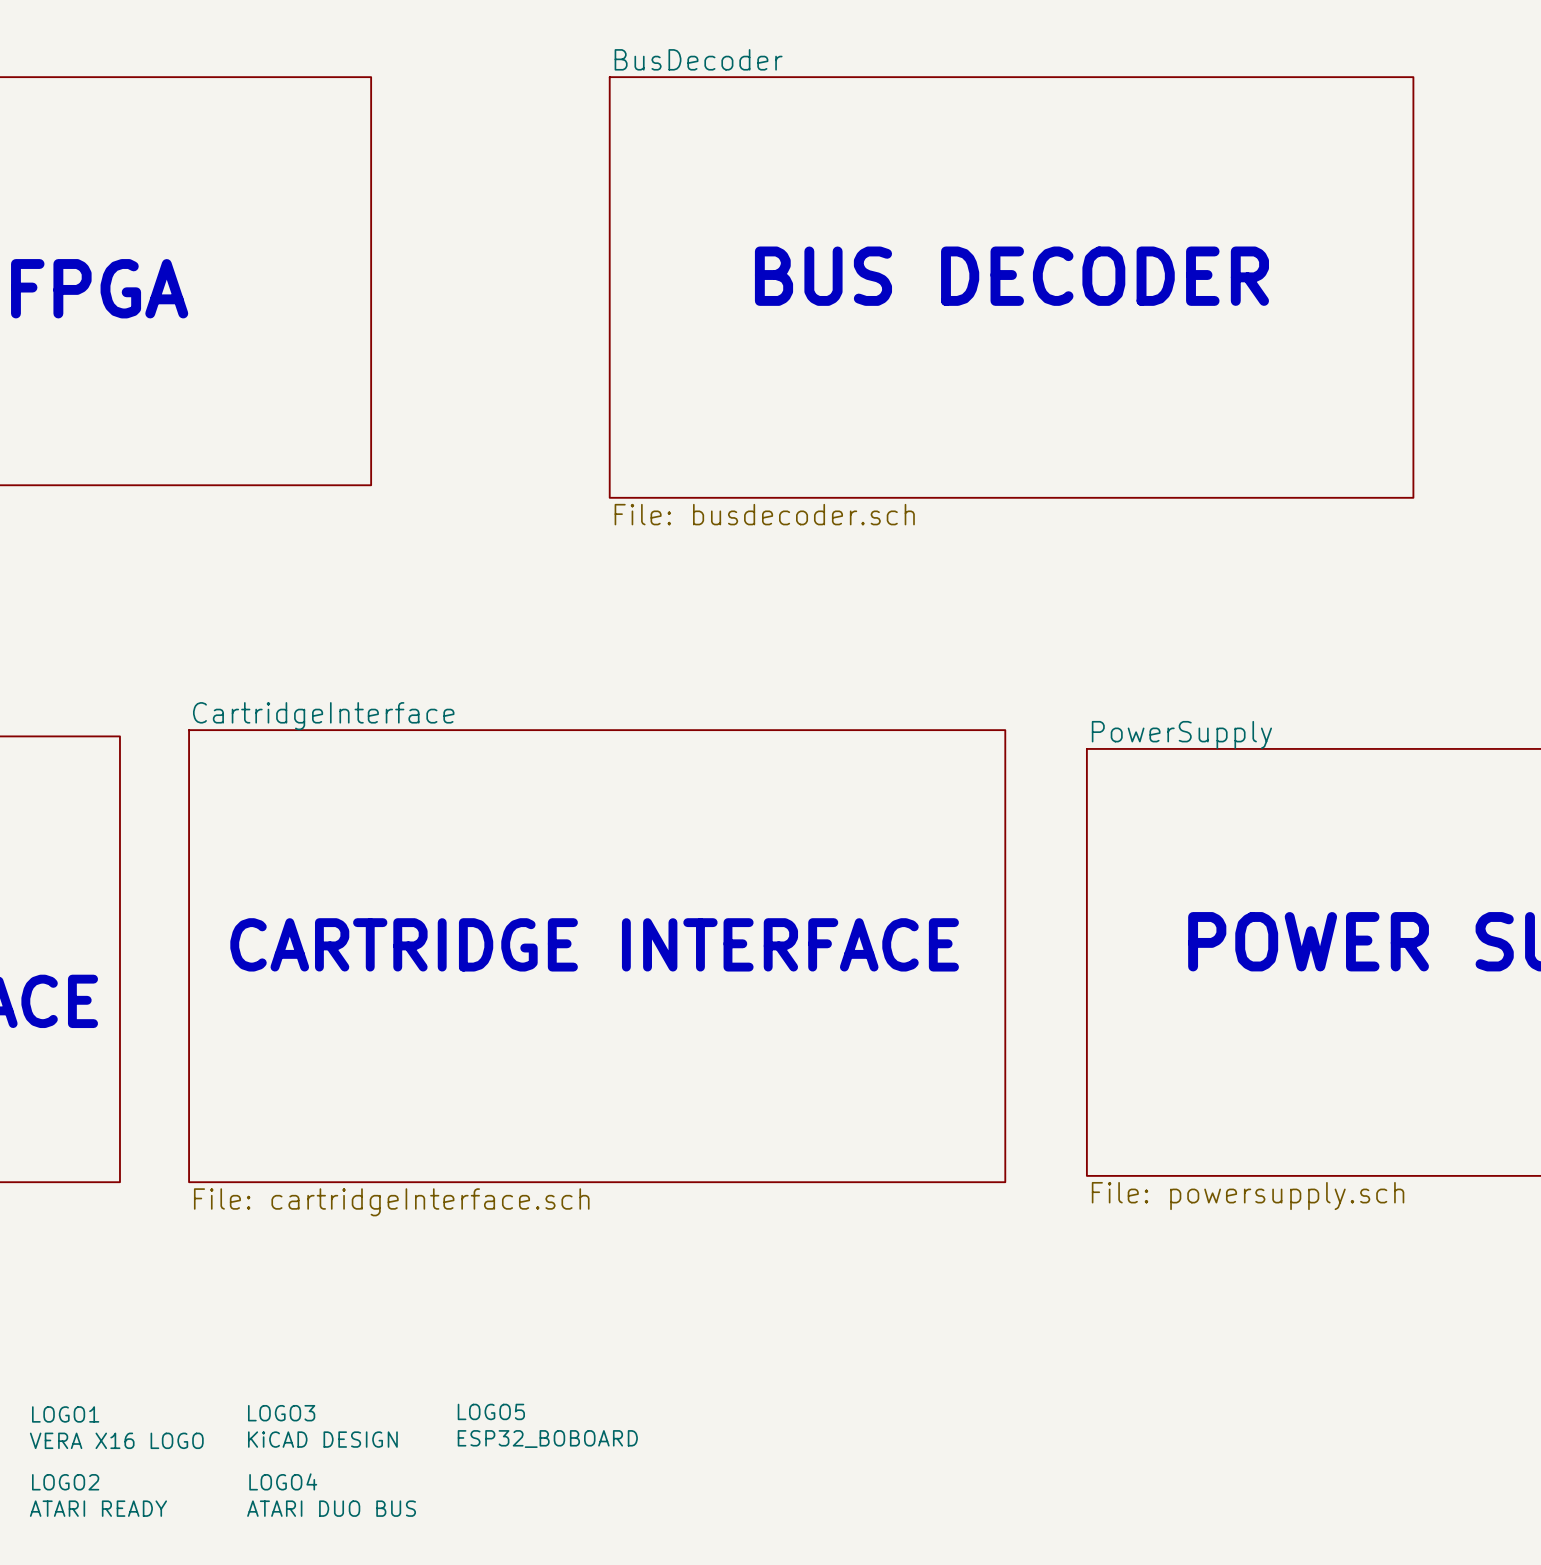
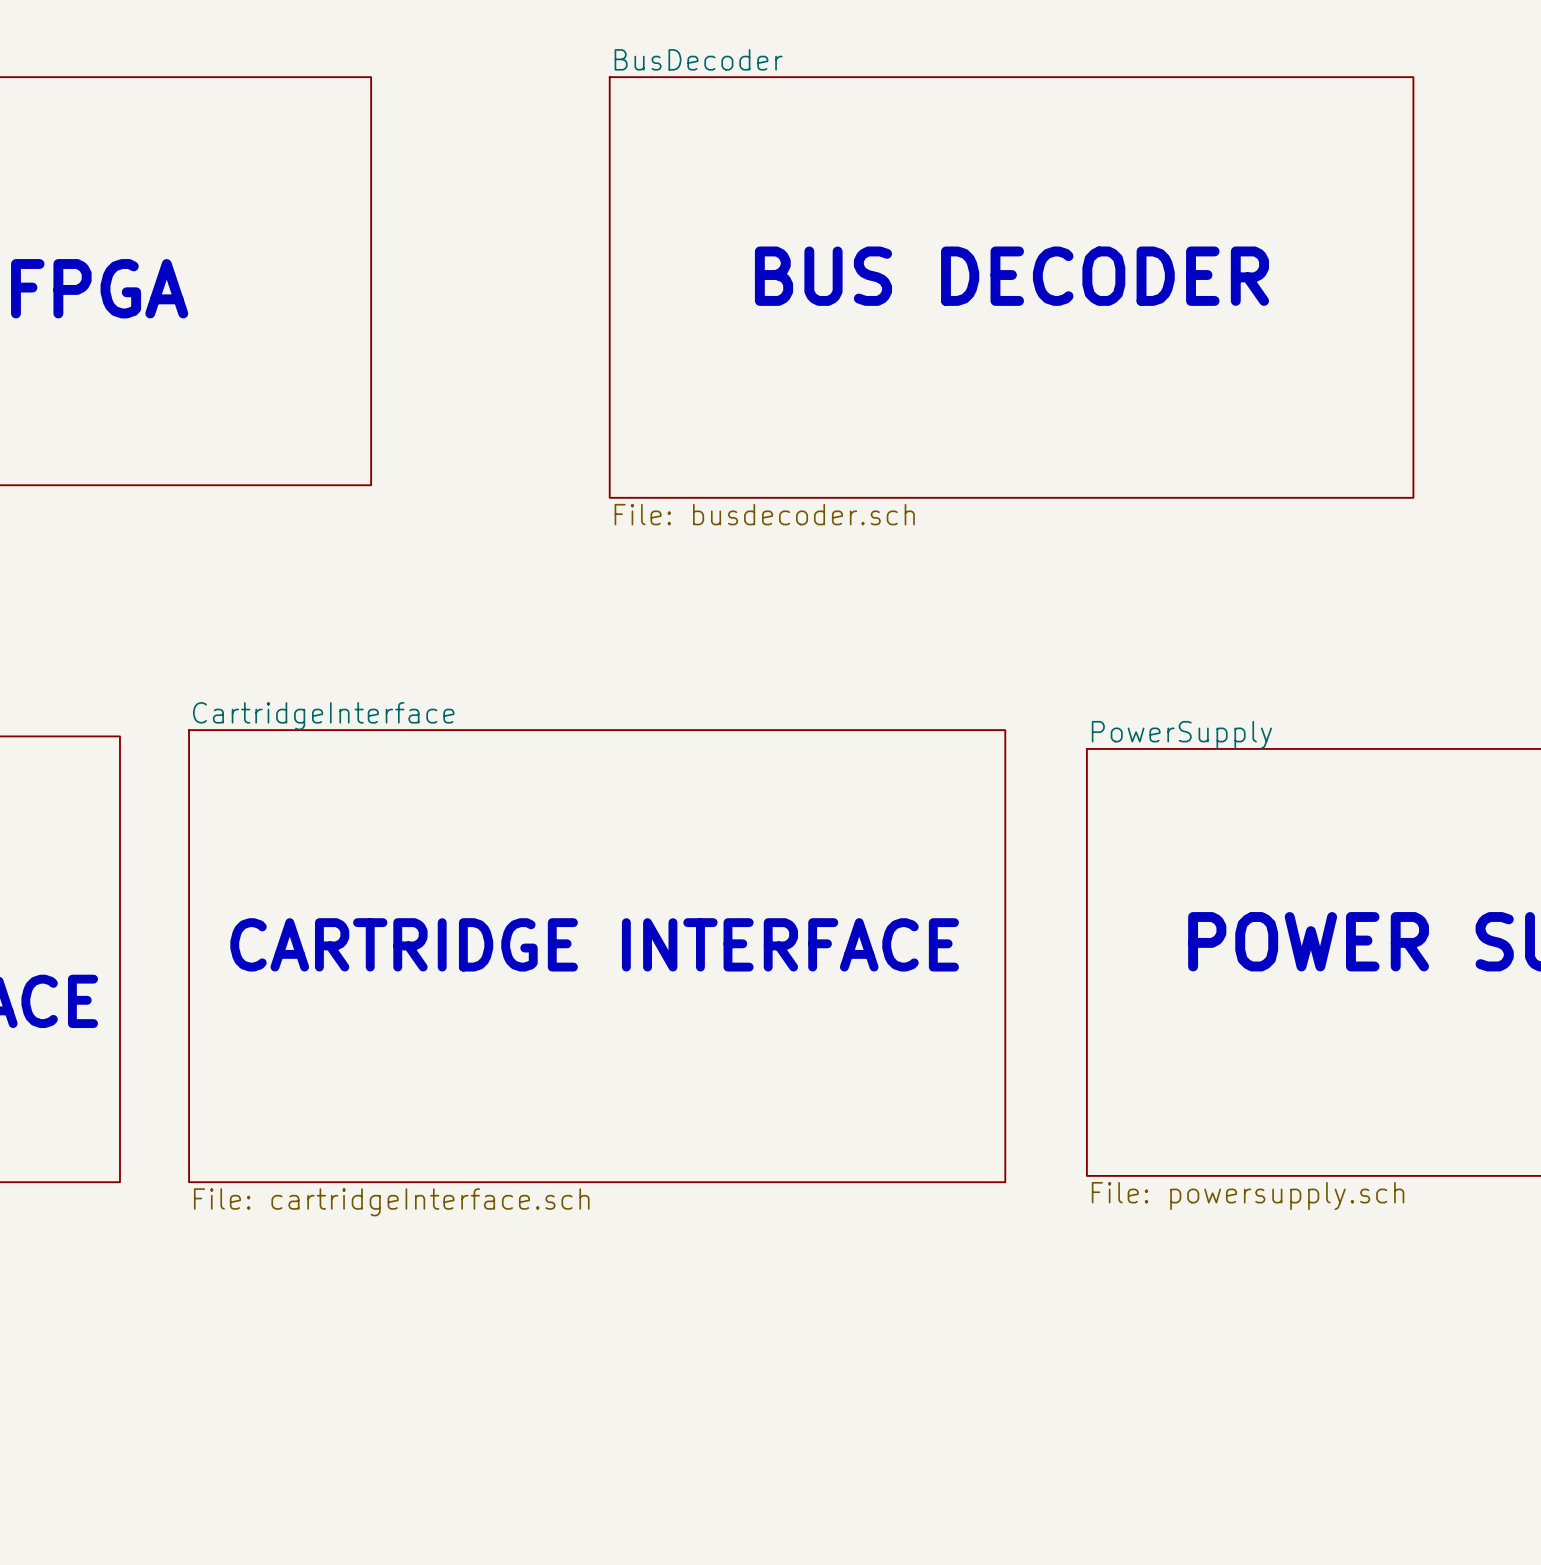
LOGO5: ESP32_BOBOARD (547, 1425) -> none
LOGO3: KiCAD DESIGN (322, 1426) -> none
LOGO1: VERA X16 LOGO (116, 1427) -> none
LOGO2: ATARI READY (98, 1495) -> none
LOGO4: ATARI DUO BUS (331, 1495) -> none

